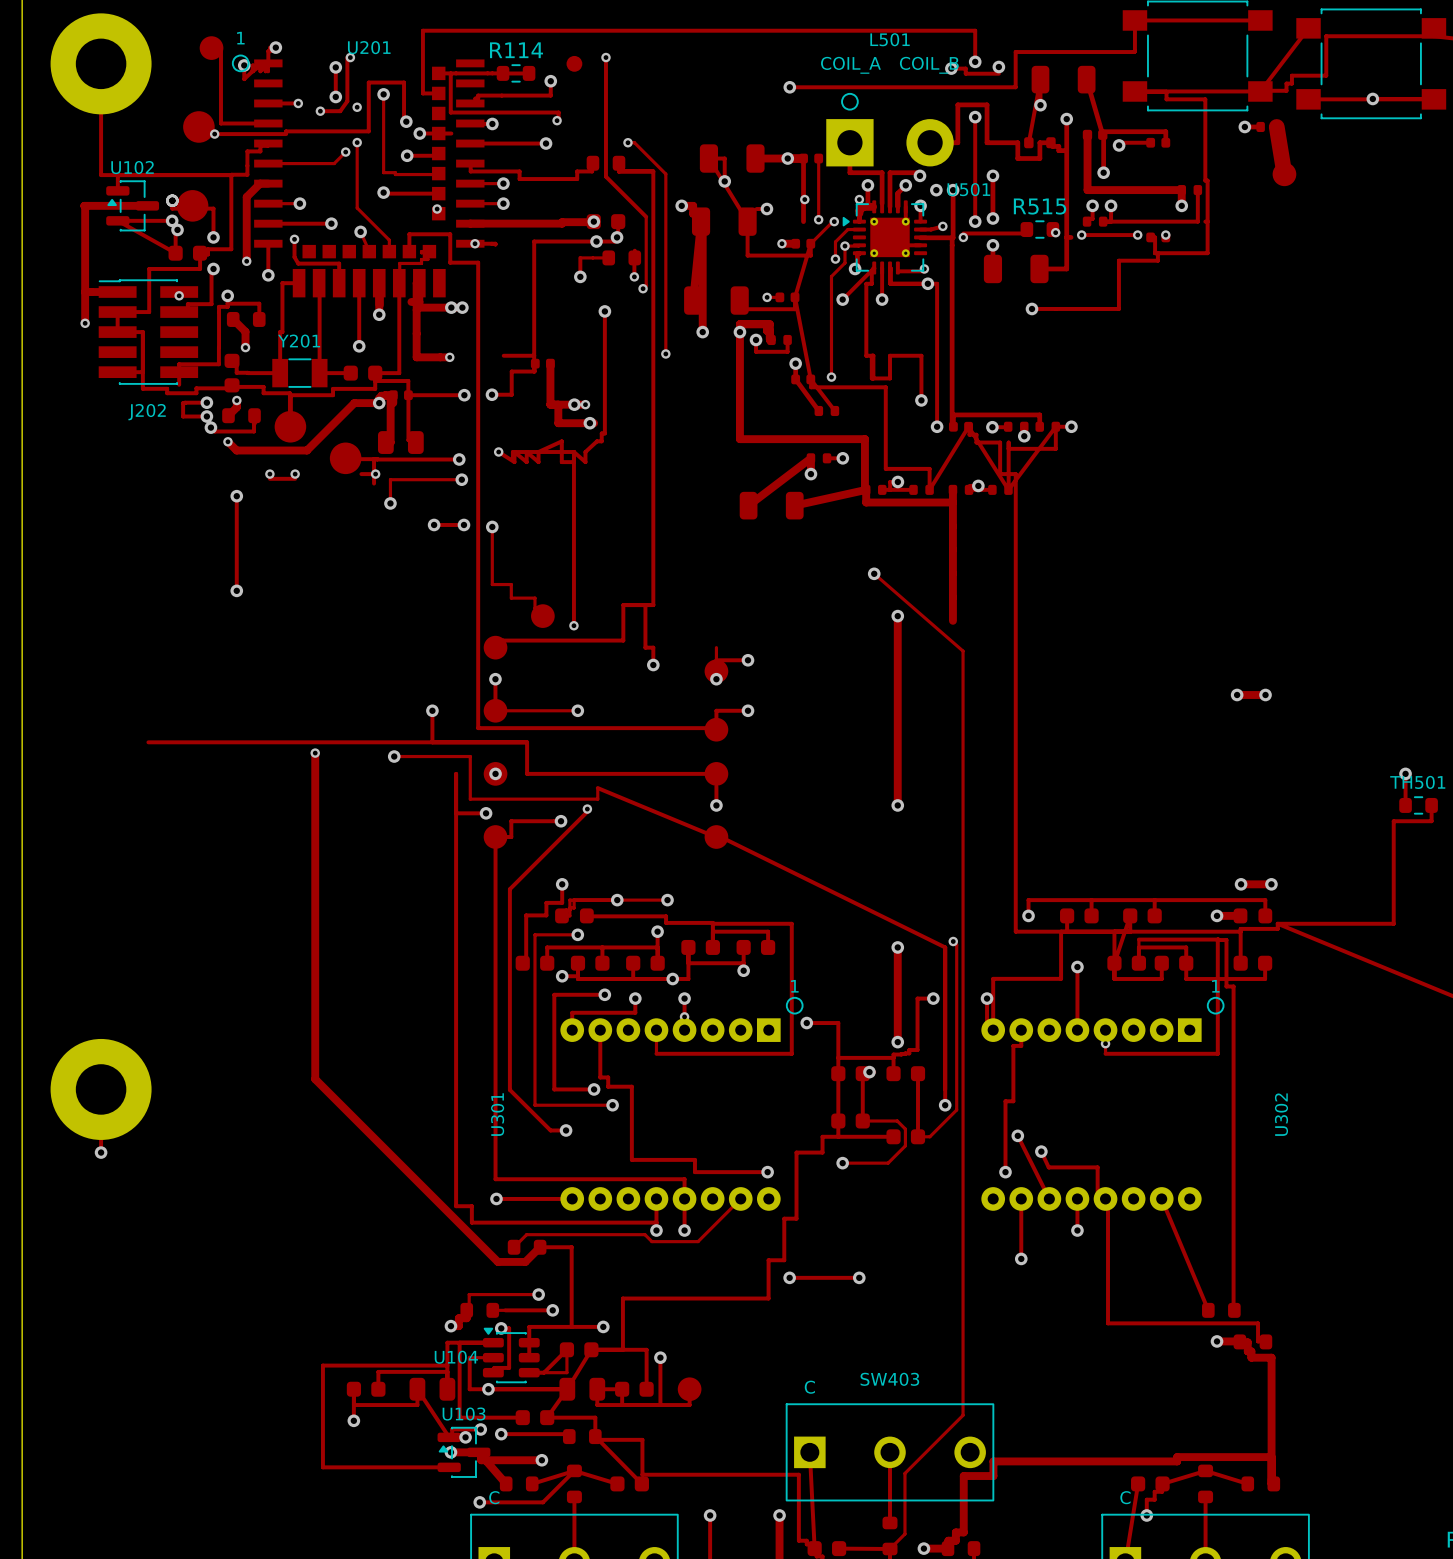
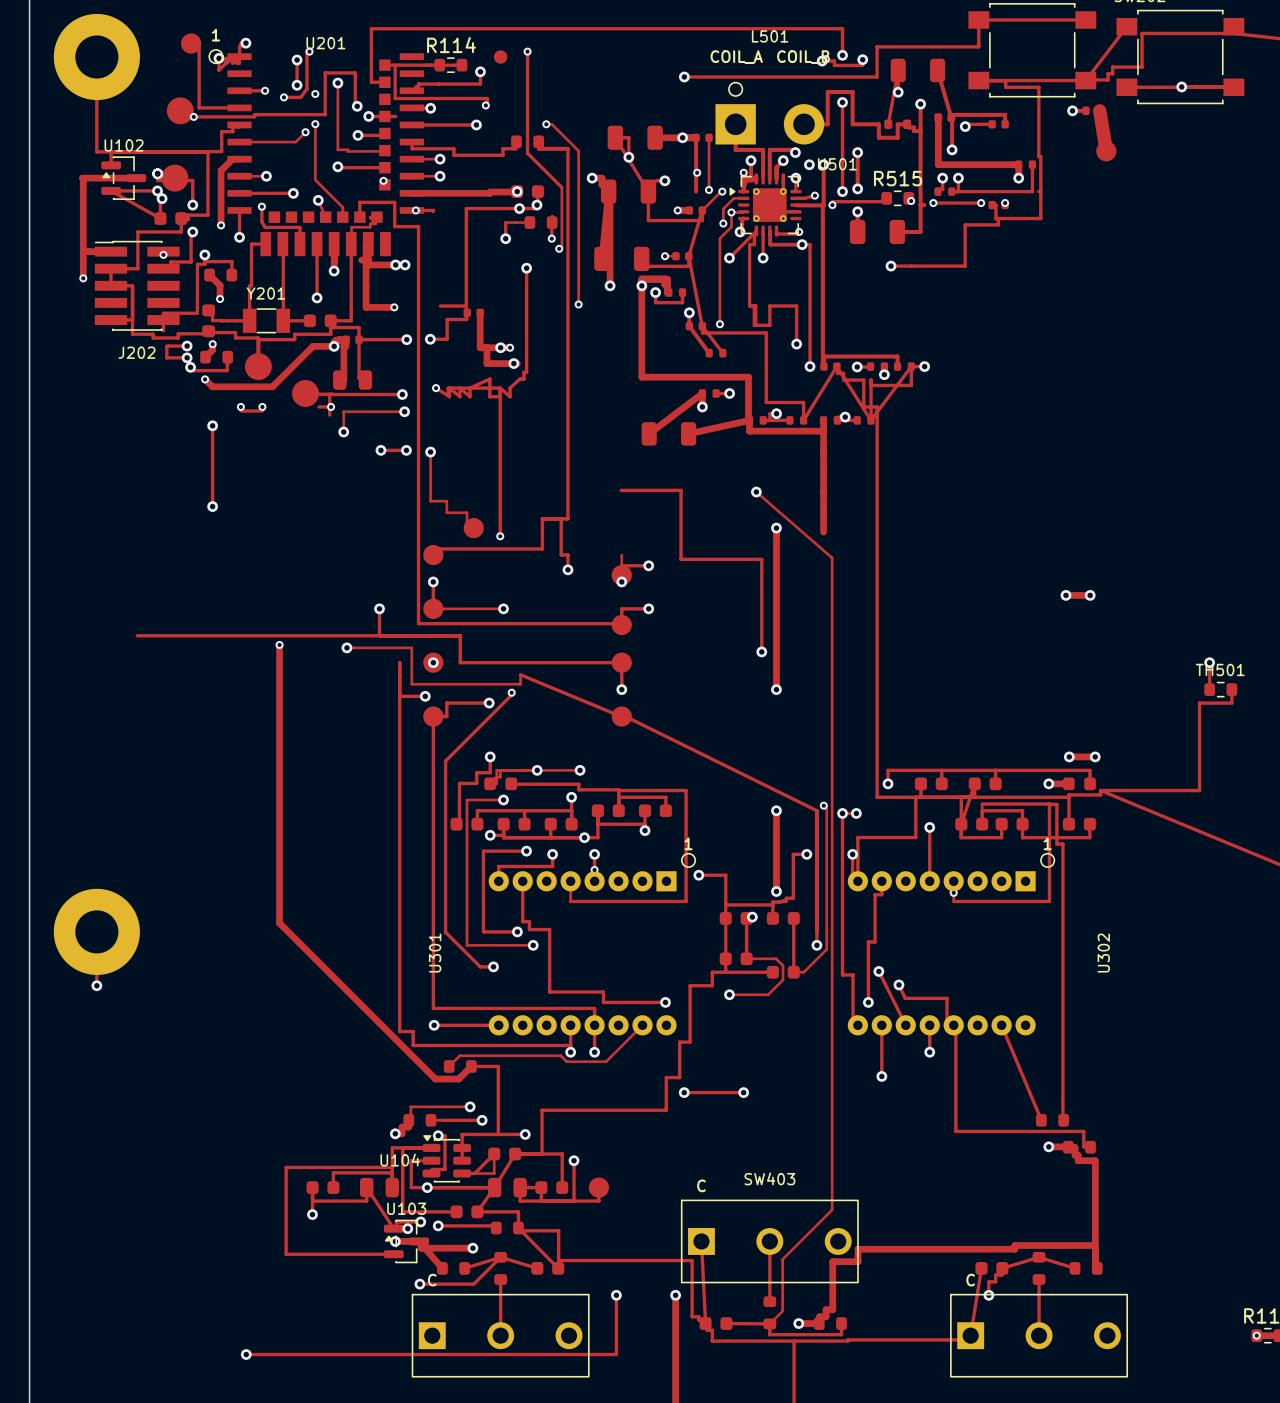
track: none -> (621, 490) (681, 490) (681, 559) (761, 559) (761, 651)
via: none -> (761, 651)
via: none -> (842, 813)
track: none -> (856, 813) (842, 813) (842, 974) (853, 974) (853, 1024) (857, 1025)
via: none -> (856, 813)

